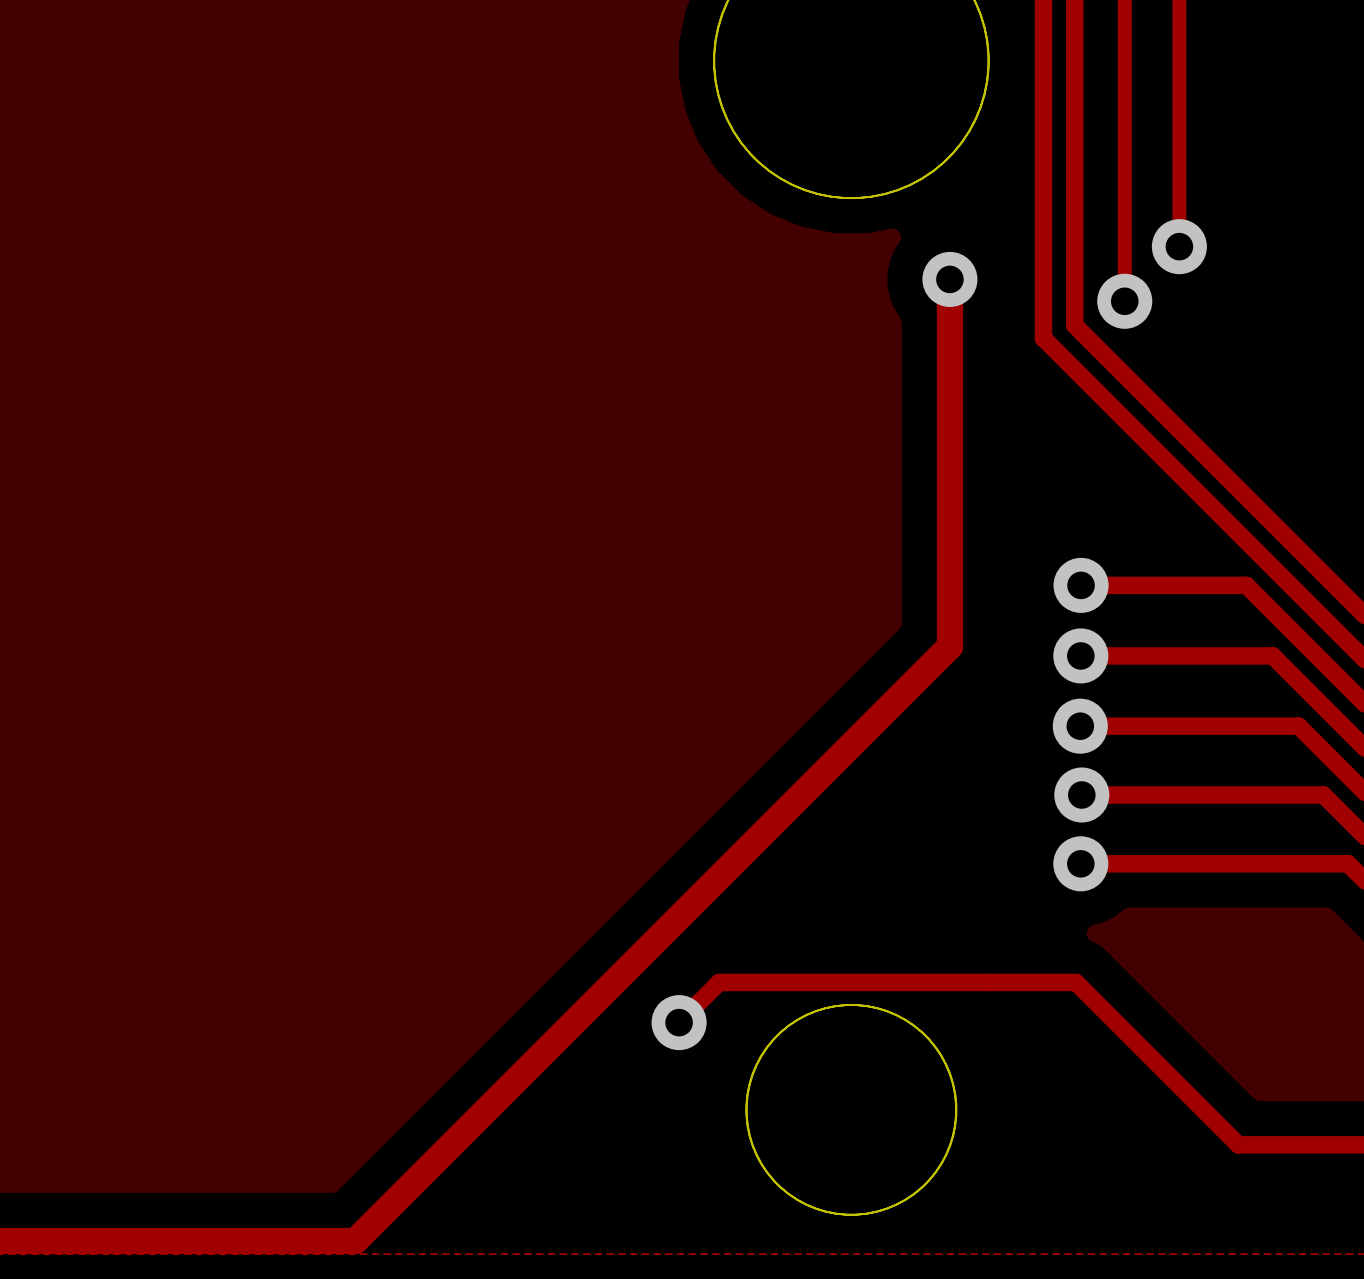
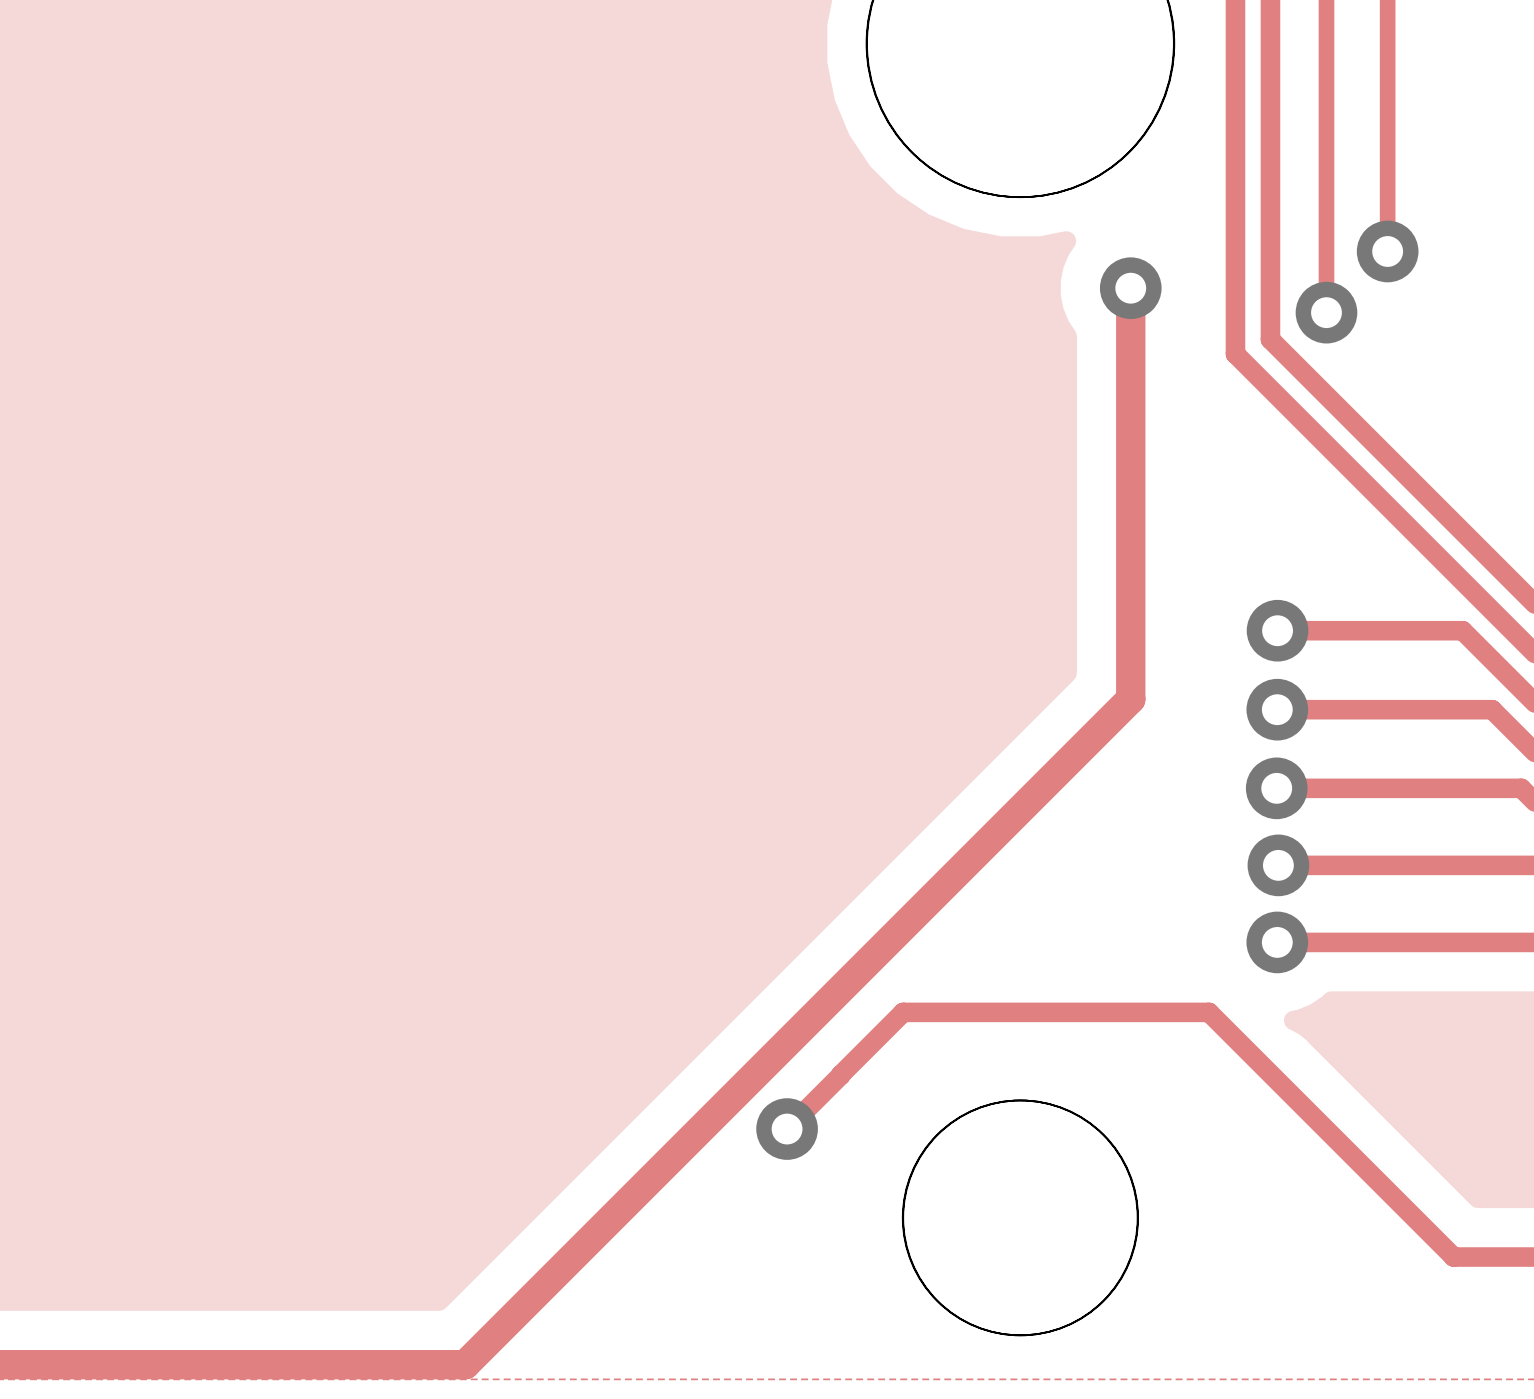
track: none -> (840, 1075) (787, 1129)
track: (1076, 982) (719, 982) (679, 1022) -> (1271, 1075) (1209, 1012) (903, 1012) (840, 1074)
via position: (679, 1022) -> (787, 1129)

